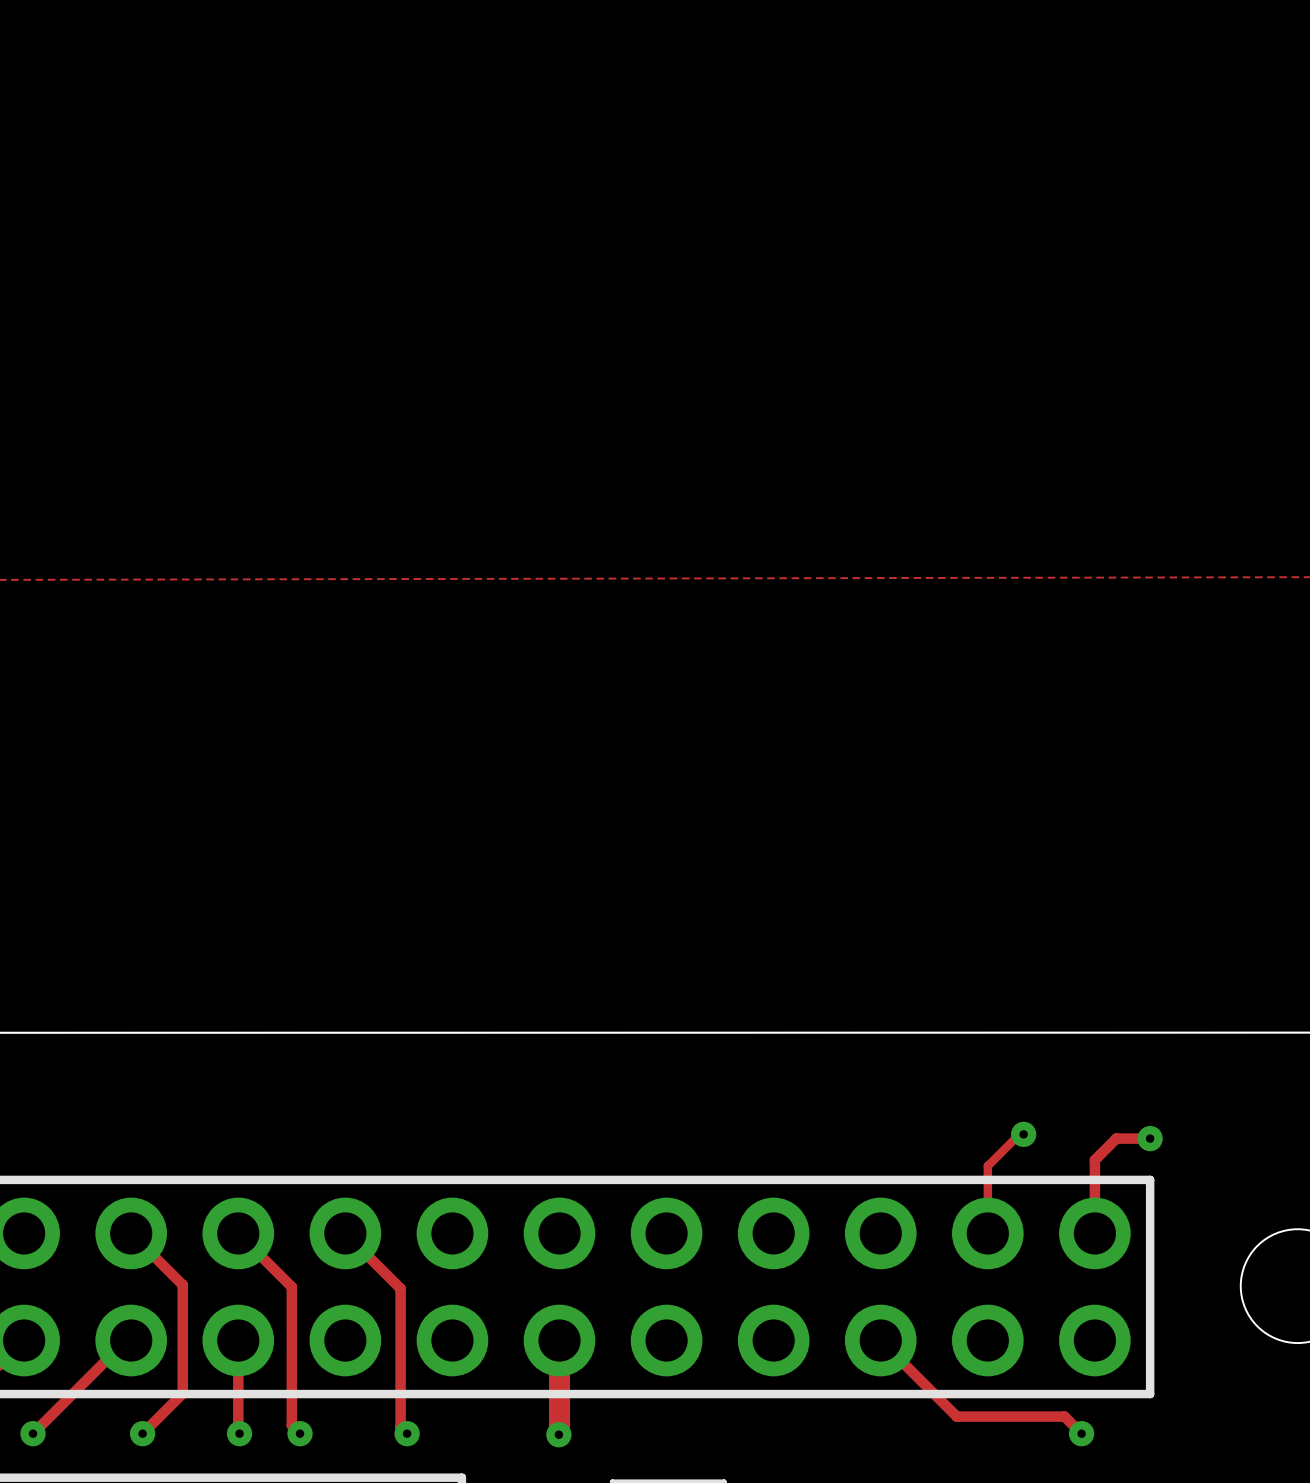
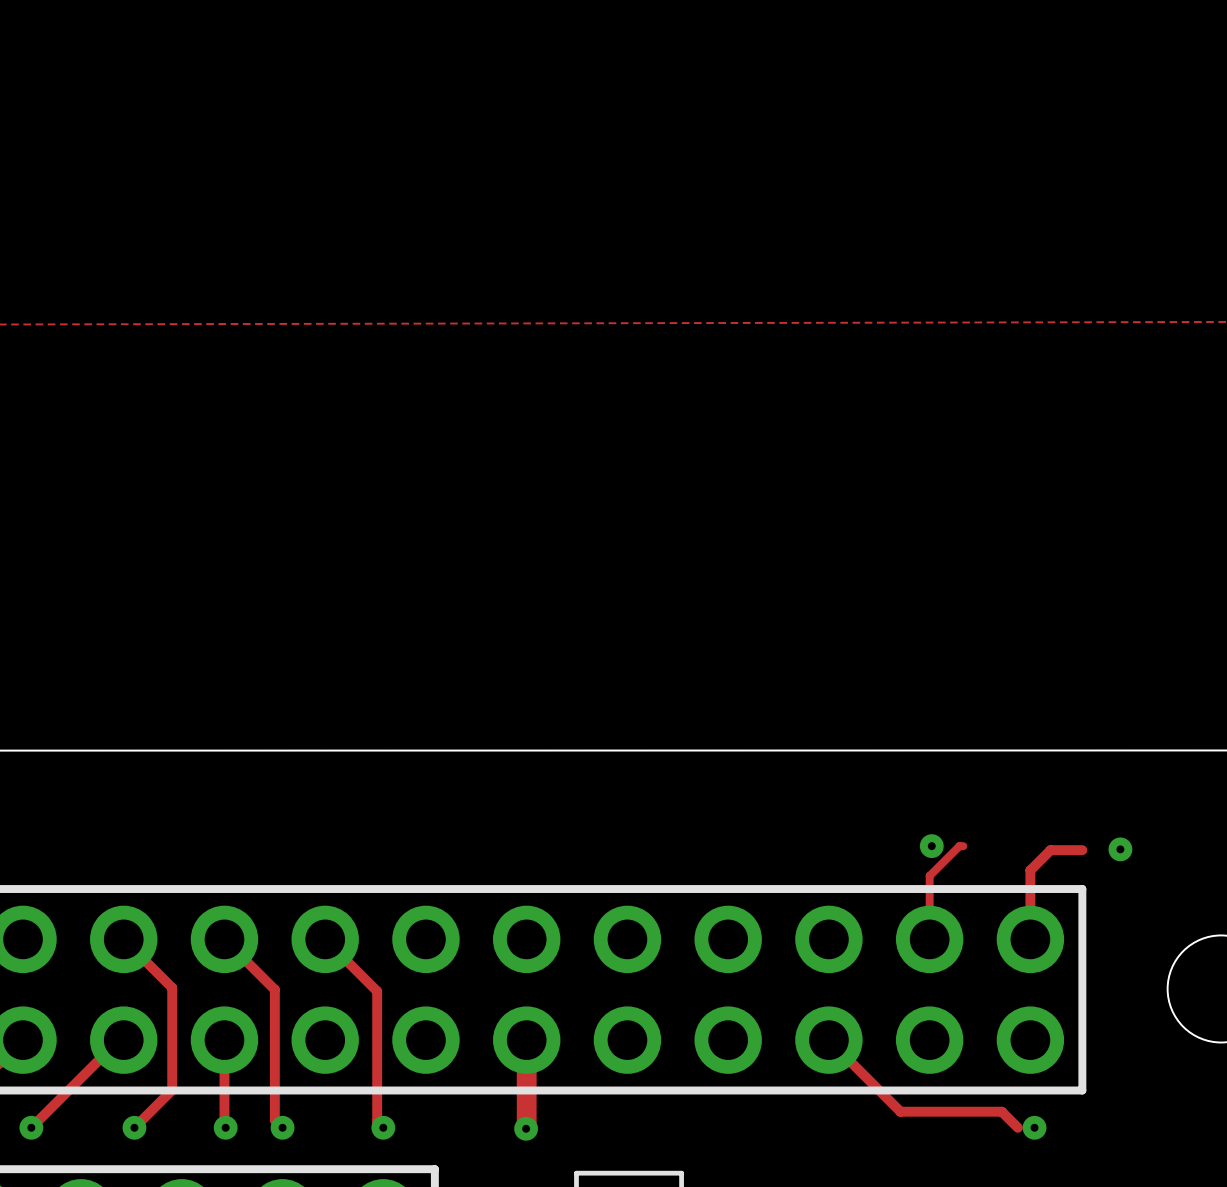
via position: (1023, 1134) -> (931, 846)
via position: (1150, 1138) -> (1120, 849)
via position: (1081, 1433) -> (1034, 1127)

